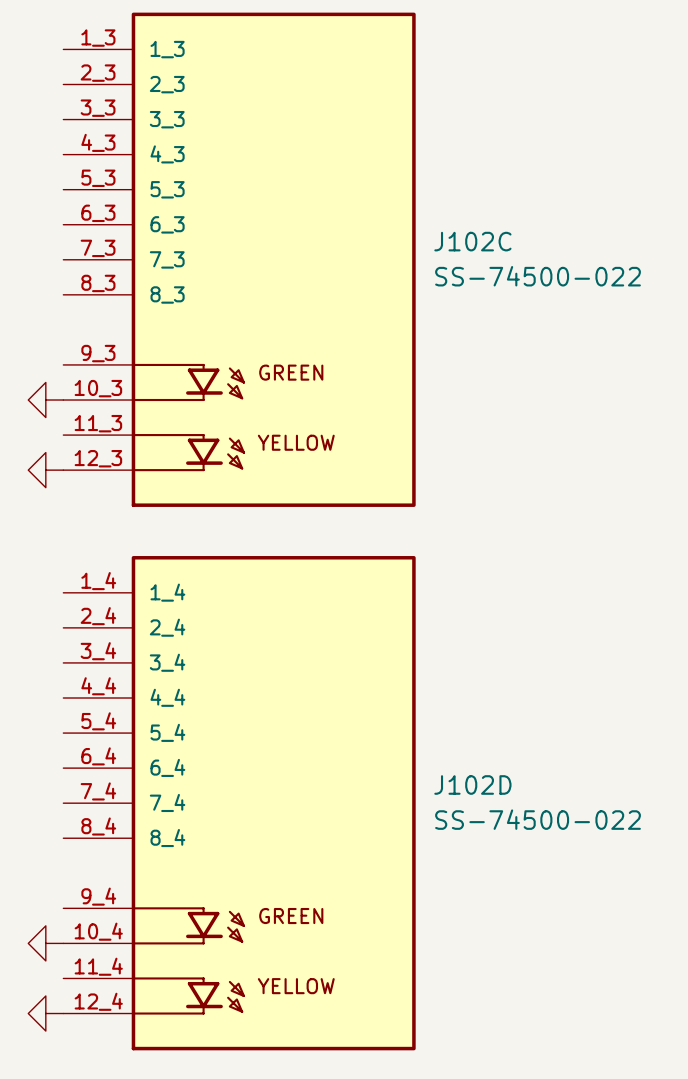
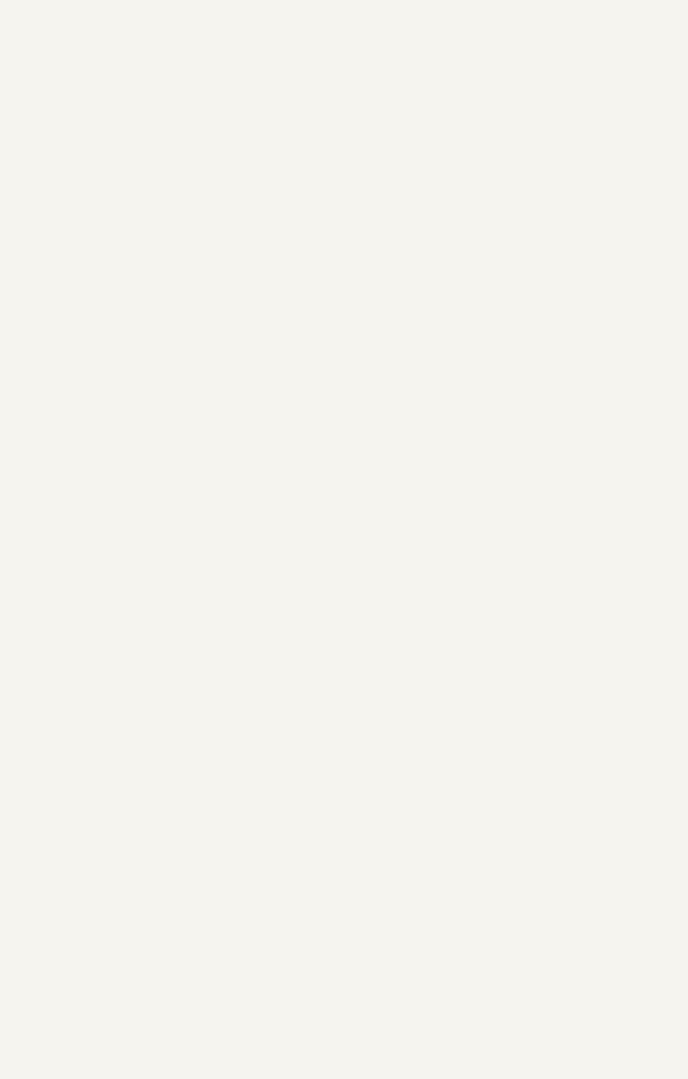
J102C: SS-74500-022 (239, 259) -> none
power symbol: (45, 400) -> none
power symbol: (45, 470) -> none
J102D: SS-74500-022 (239, 803) -> none
power symbol: (45, 943) -> none
power symbol: (45, 1013) -> none

